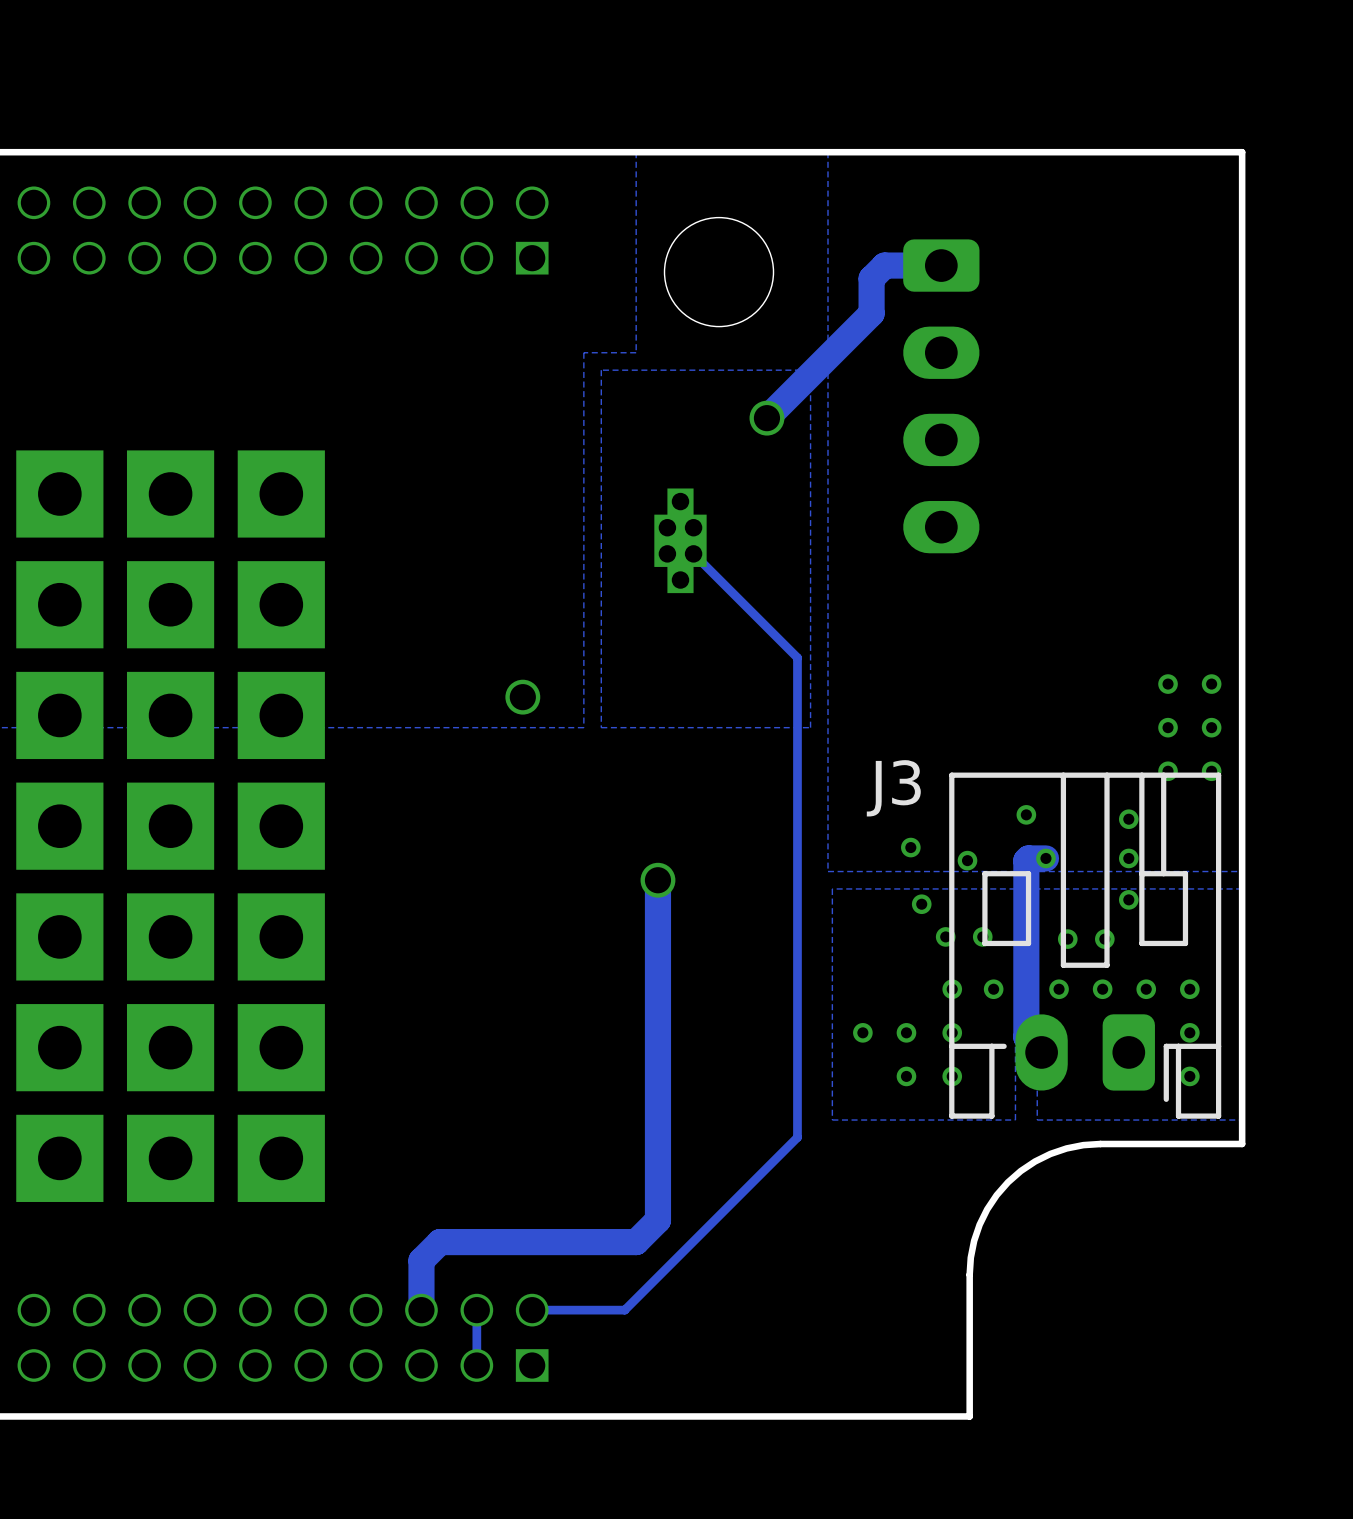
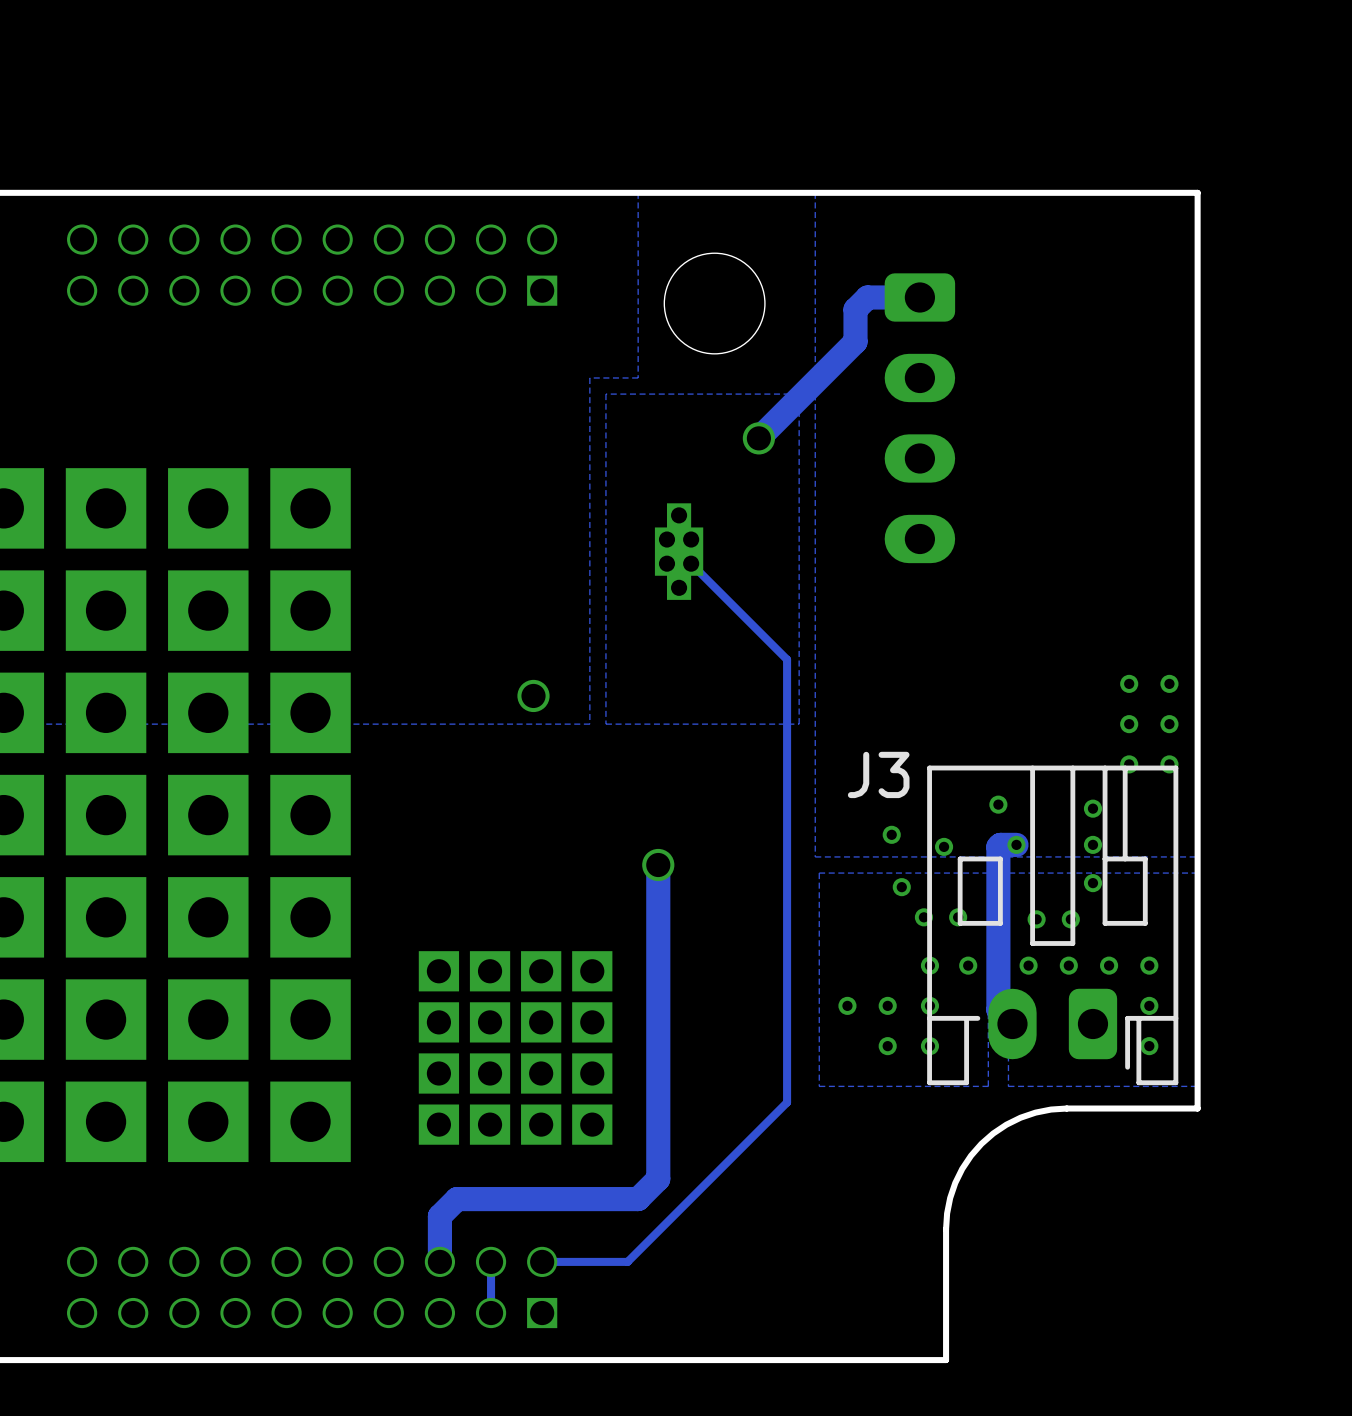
part: none -> (515, 1047)

